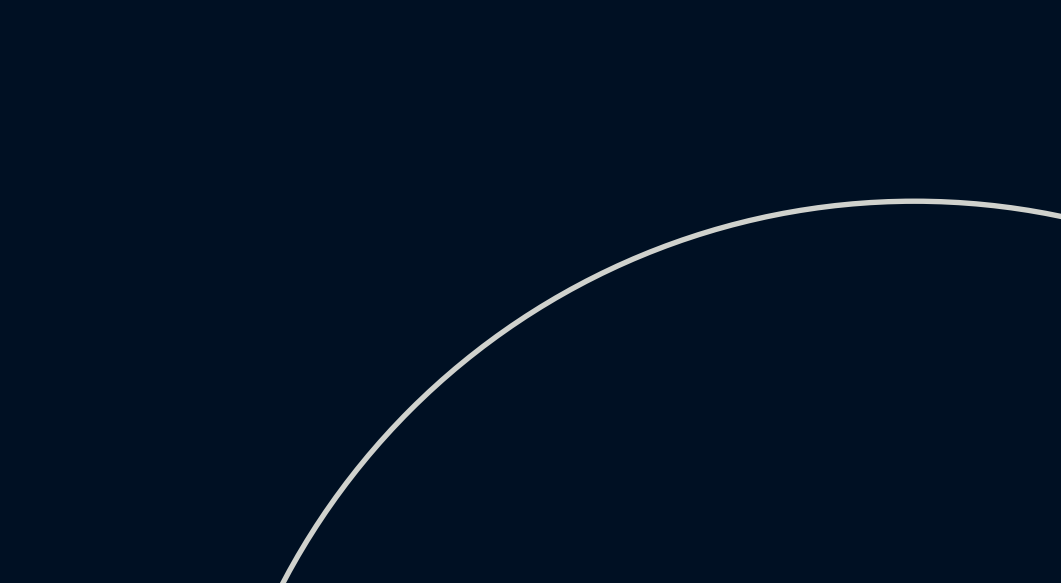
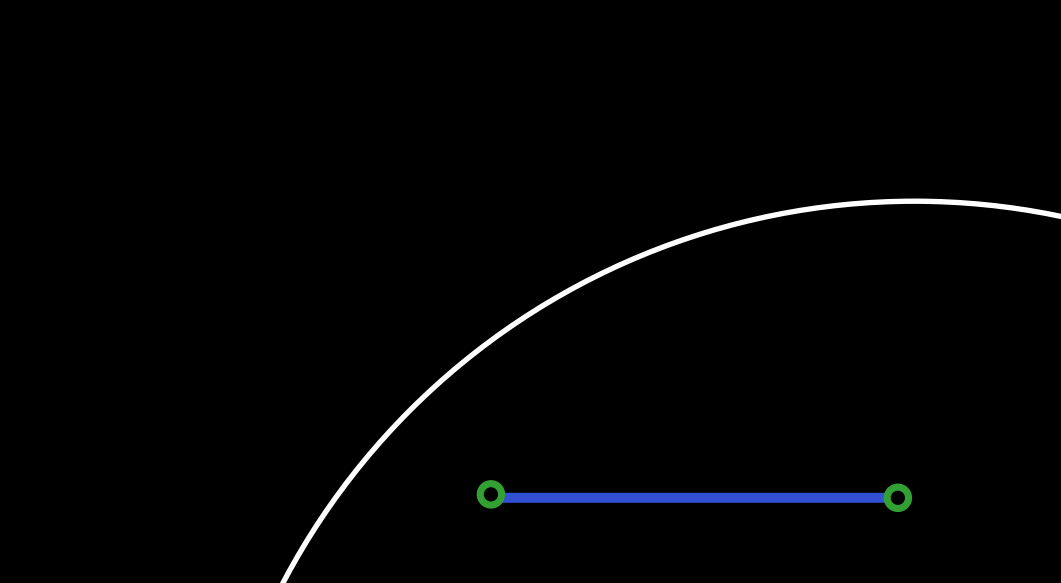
track: none -> (490, 494) (494, 497) (897, 497)
via: none -> (490, 494)
via: none -> (897, 497)

